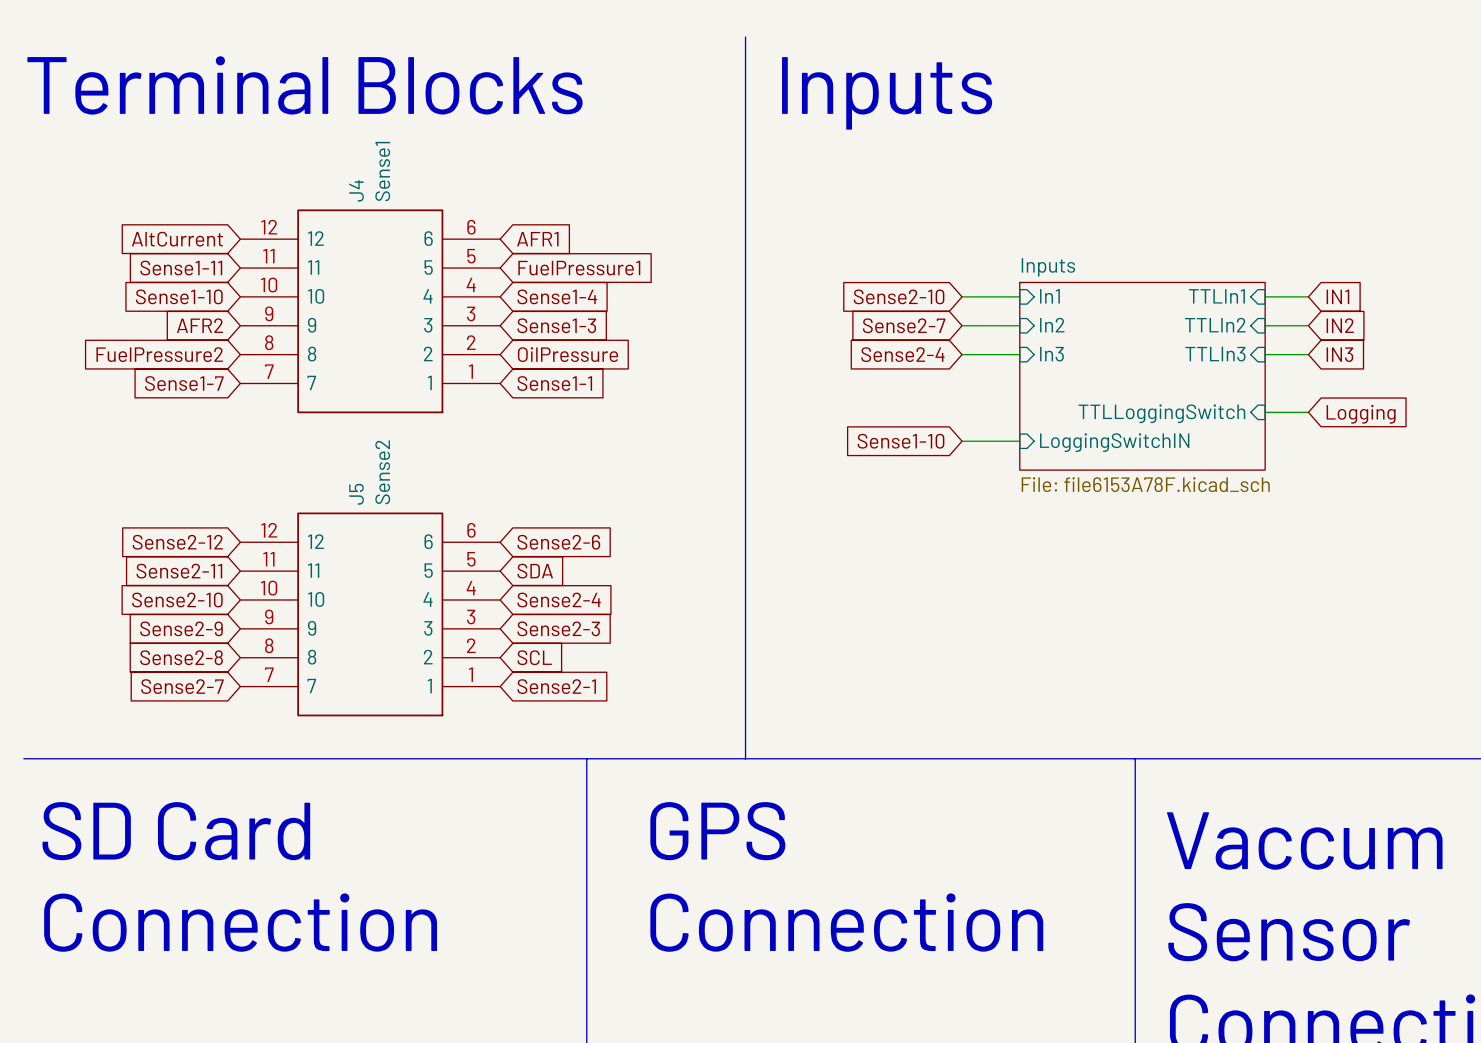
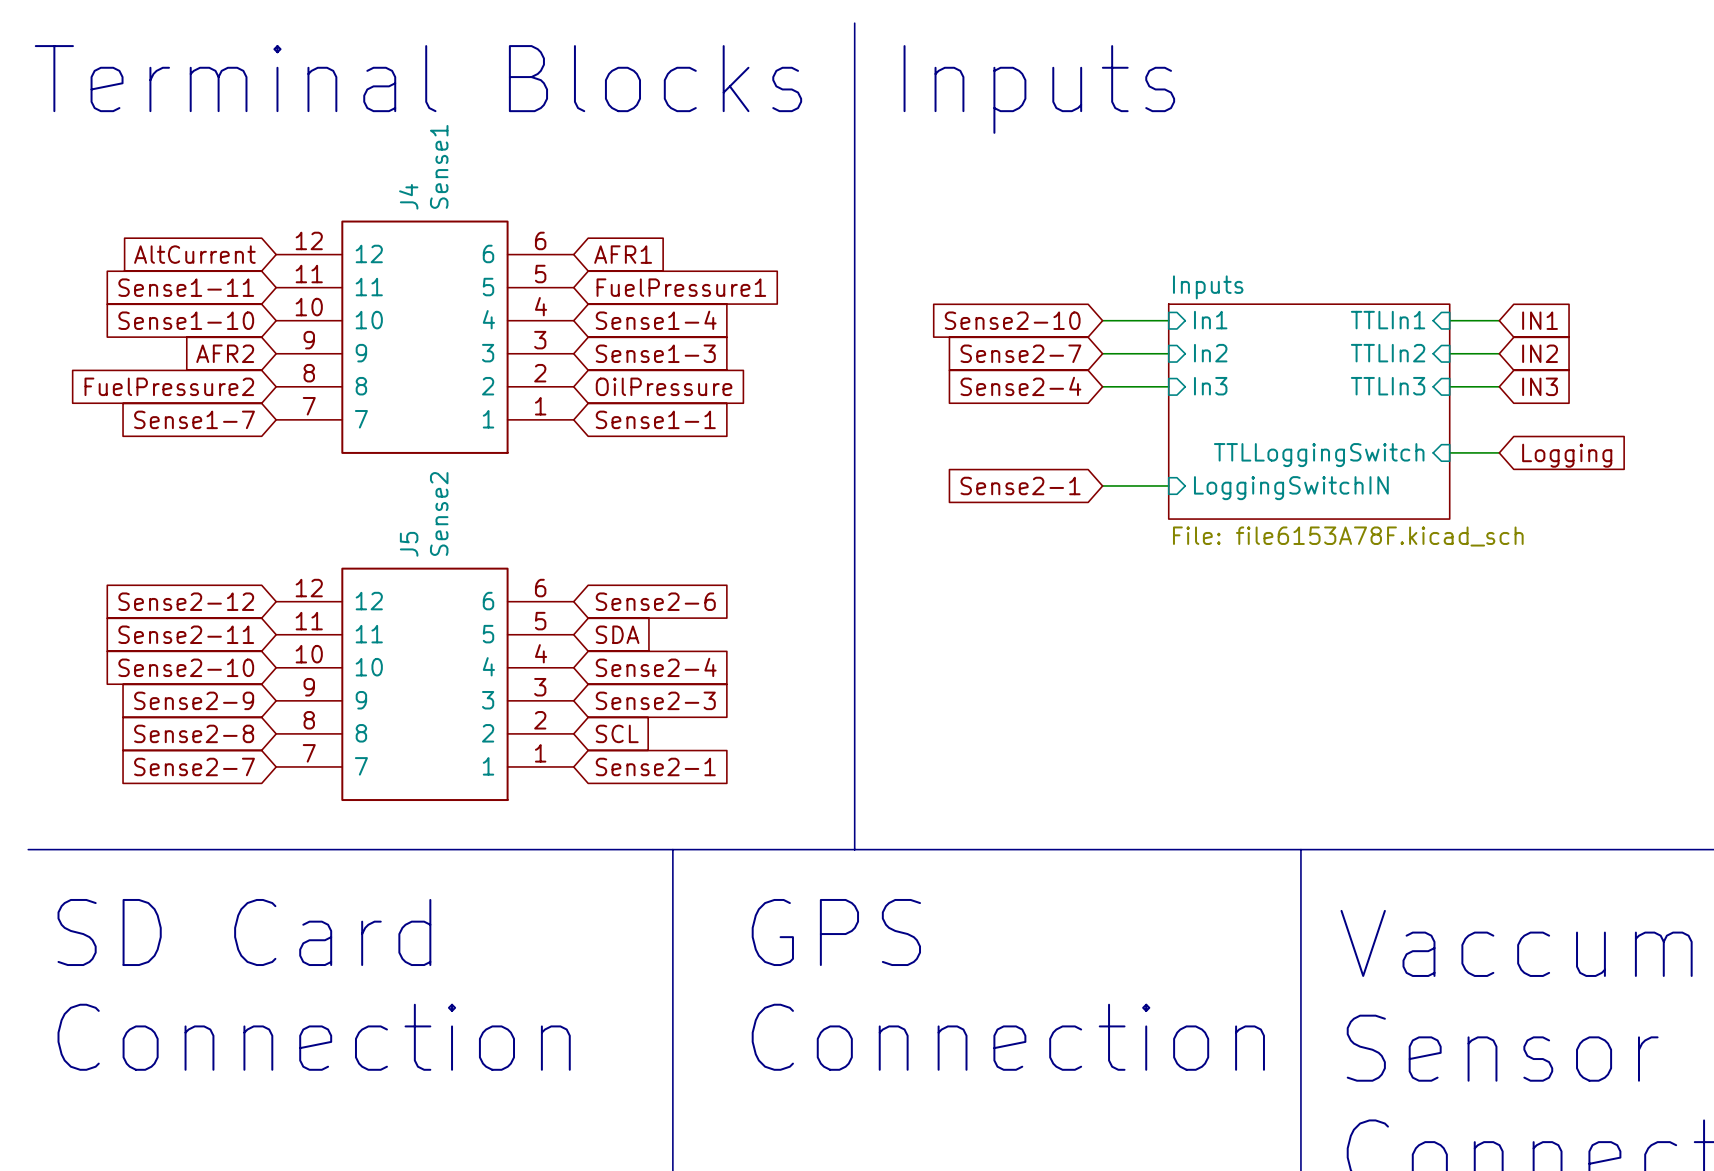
global label: Sense1-10 (900, 441) -> Sense2-1 (1020, 485)

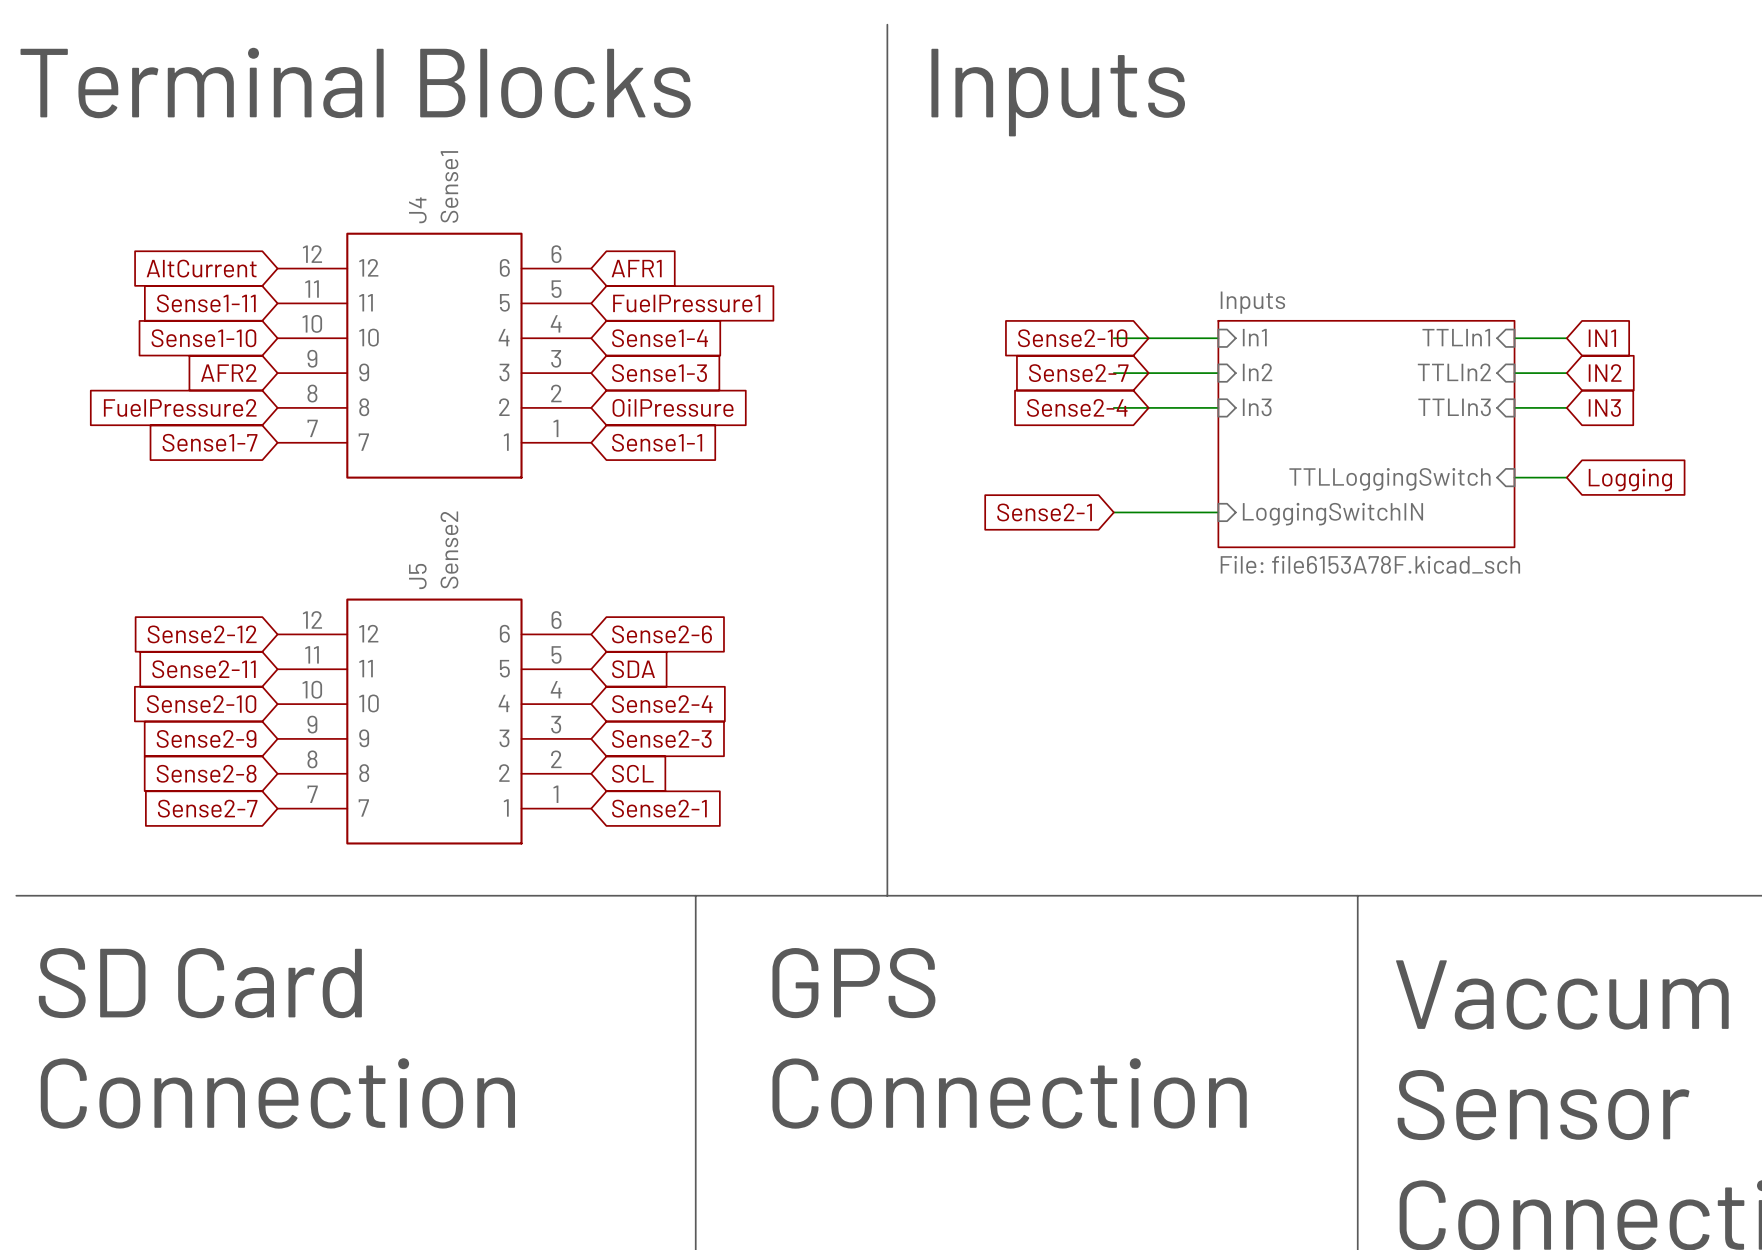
wire: none -> (1113, 338) (1148, 338)
wire: none -> (1113, 373) (1148, 373)
wire: none -> (1113, 407) (1148, 407)
global label position: Sense2-1 (1020, 485) -> Sense2-1 (1044, 512)
wire: none -> (1113, 512) (1148, 512)

